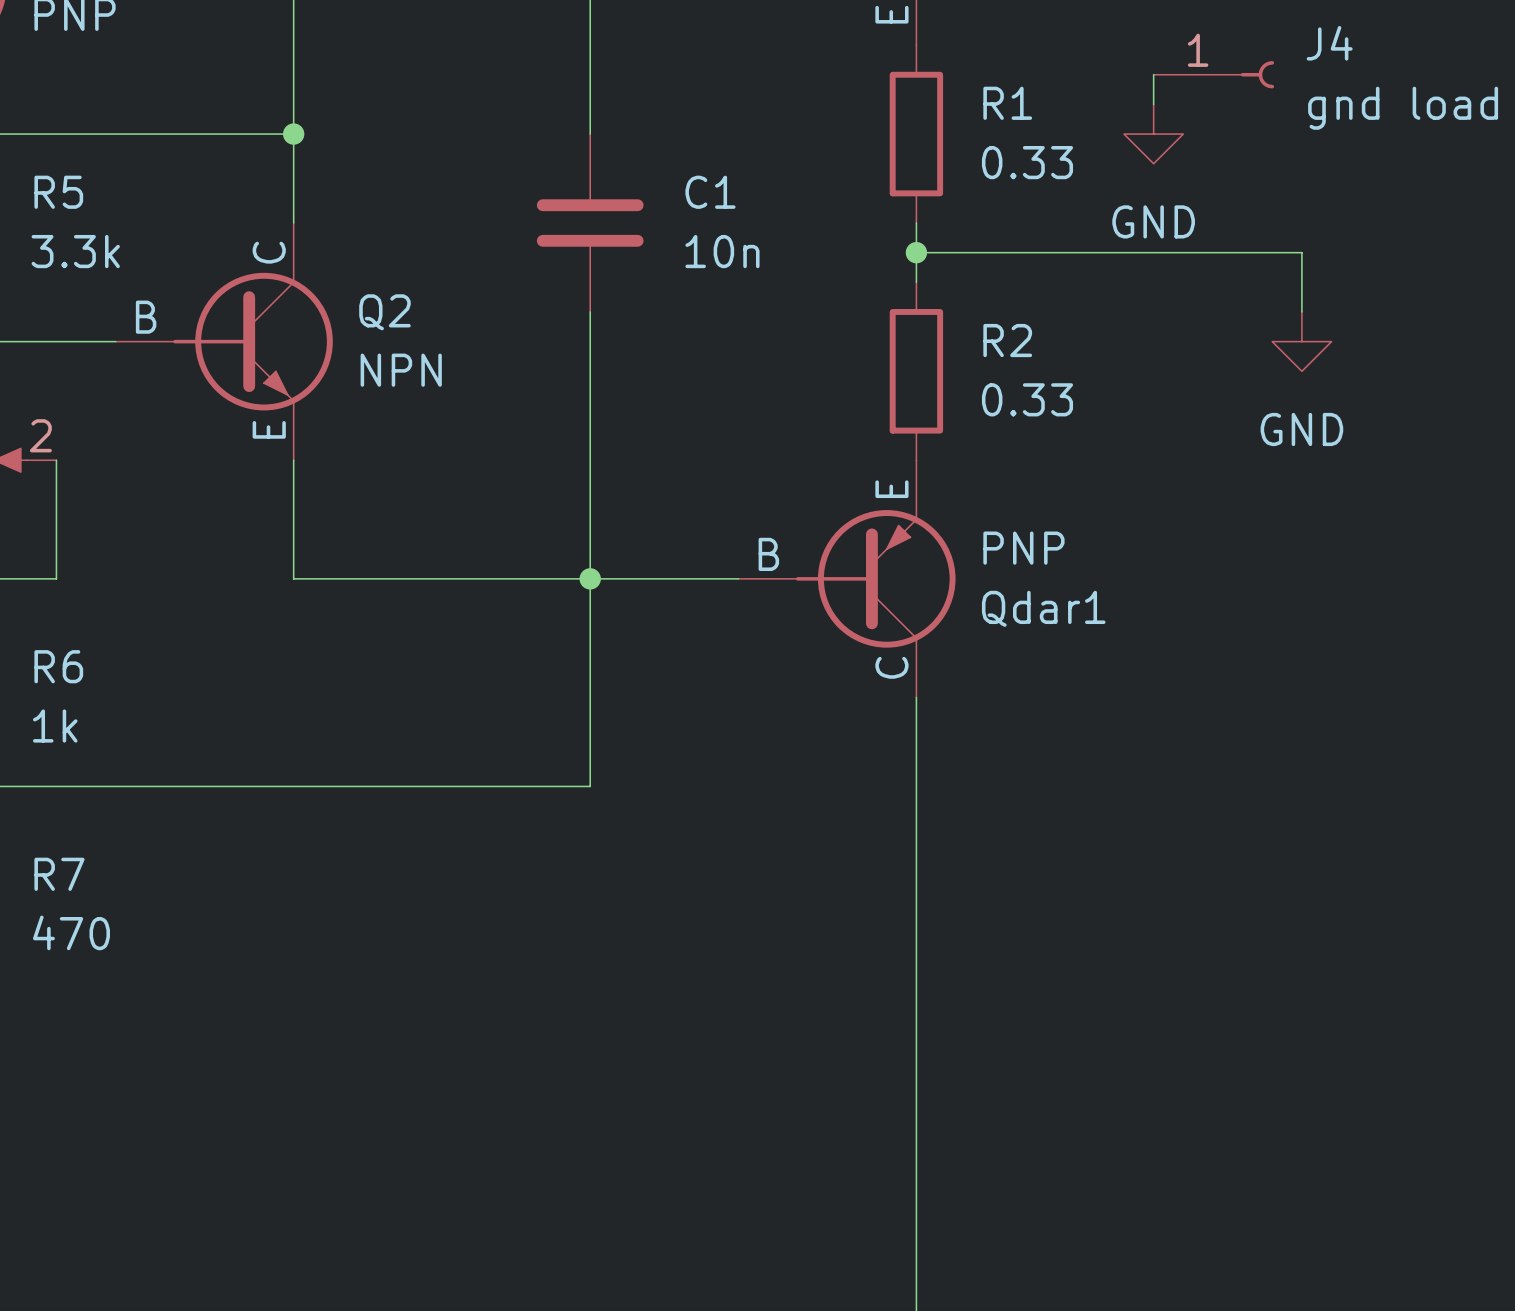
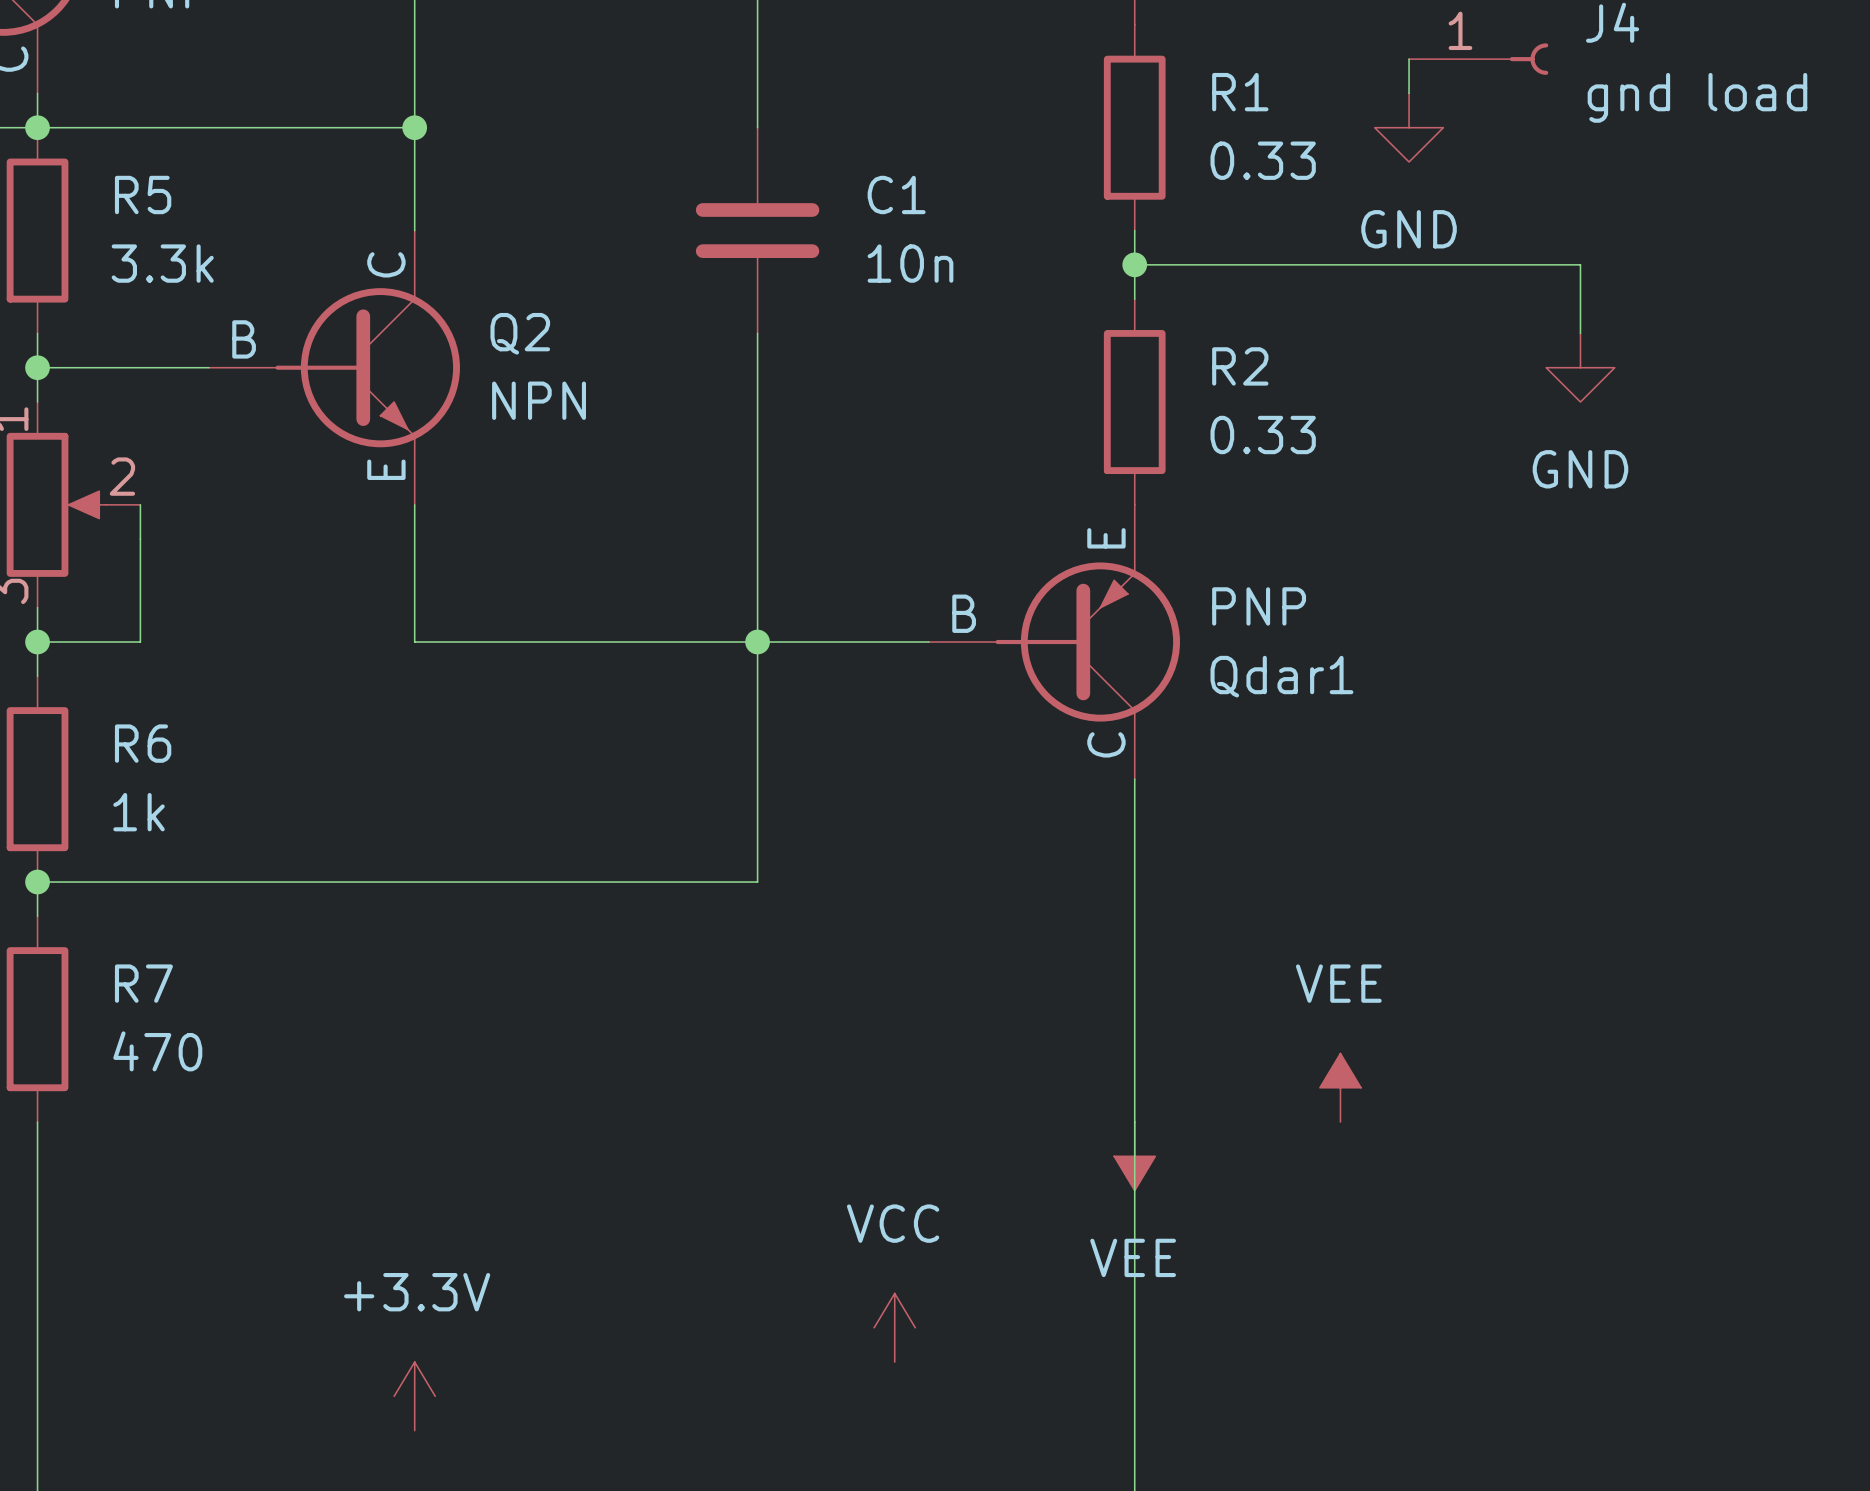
power symbol: none -> VEE (1340, 1087)
power symbol: none -> VEE (1134, 1156)
power symbol: none -> VCC (894, 1327)
power symbol: none -> +3.3V (414, 1396)

